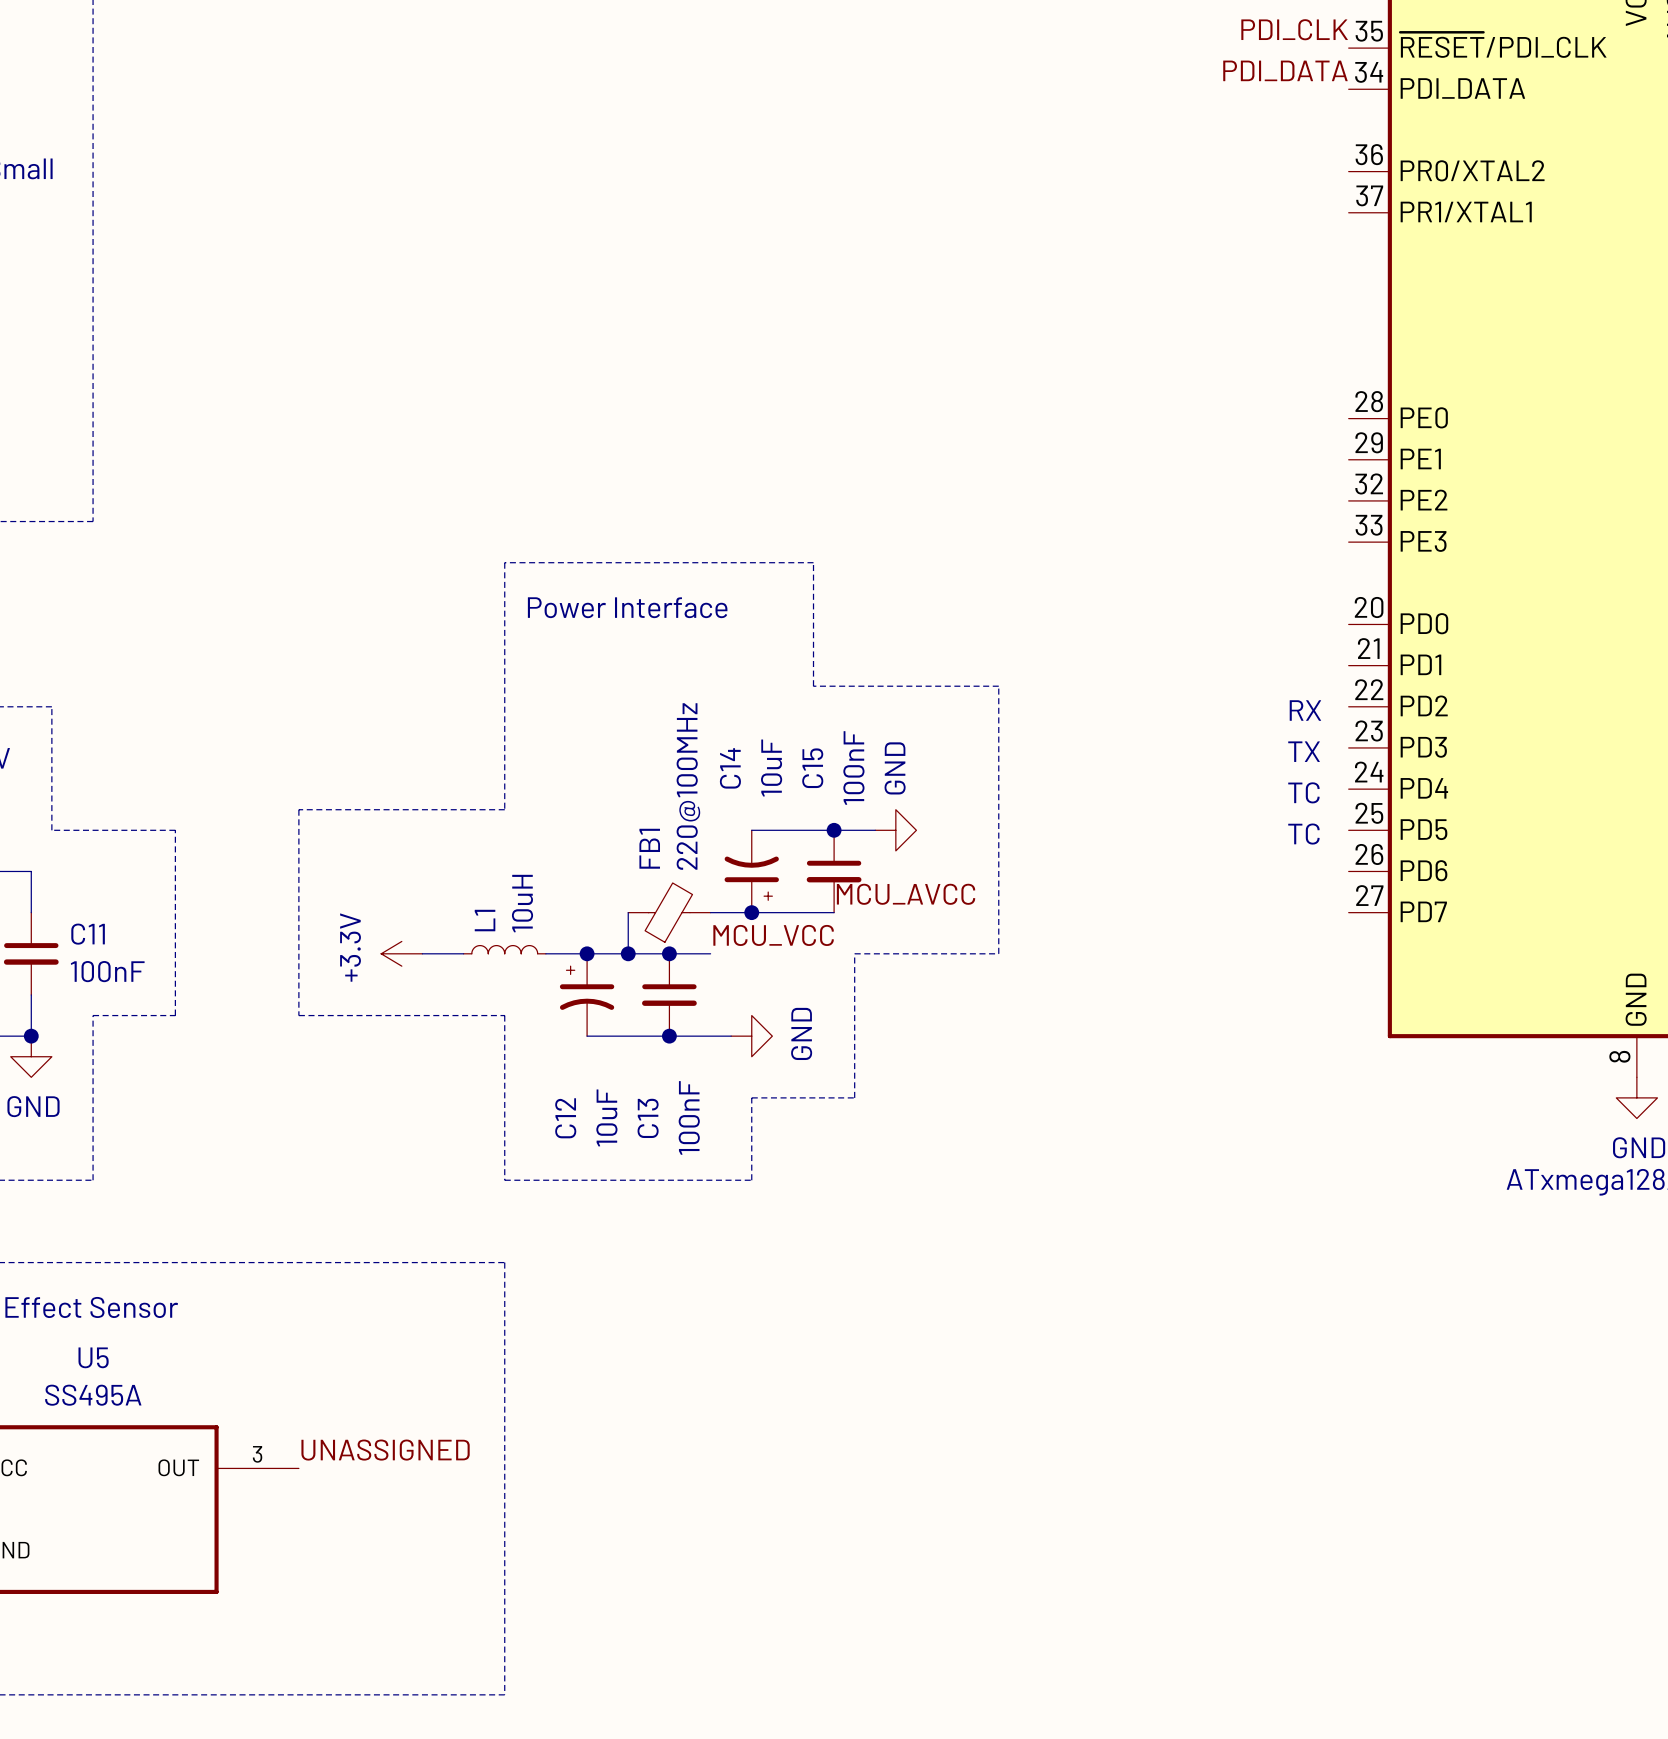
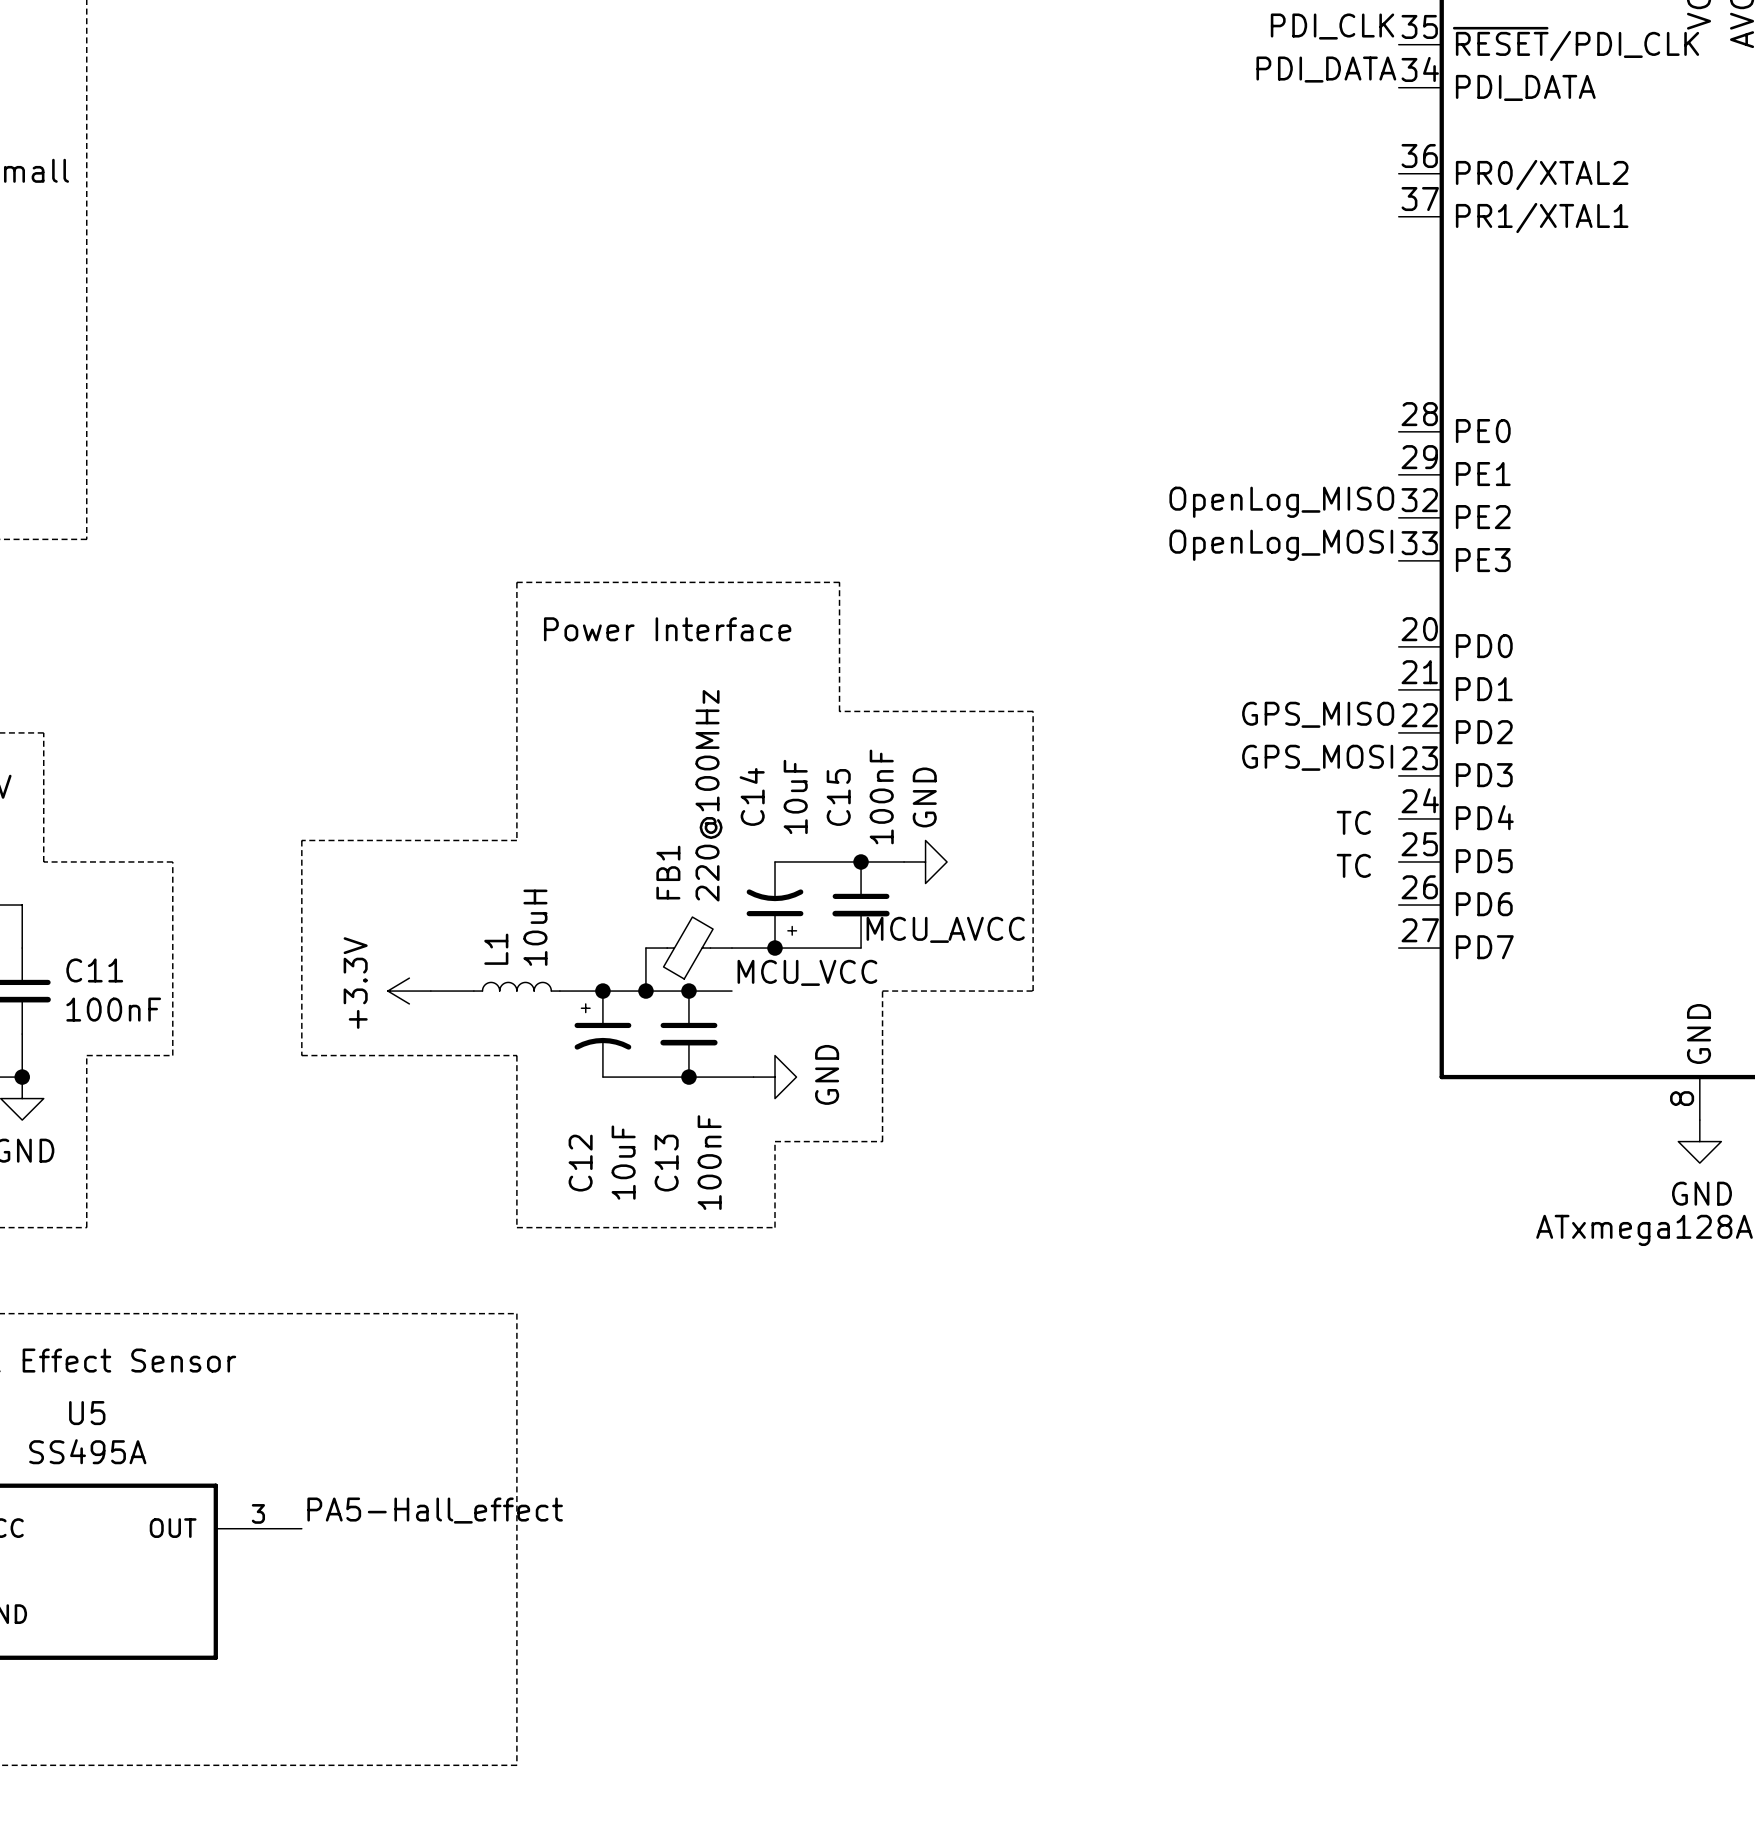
label: none -> OpenLog_MISO (1281, 502)
label: none -> OpenLog_MOSI (1281, 545)
label: none -> GPS_MISO (1318, 714)
text: RX (1305, 710) -> none
label: none -> GPS_MOSI (1317, 757)
text: TX (1304, 751) -> none
label: UNASSIGNED (385, 1450) -> PA5-Hall_effect (435, 1510)

